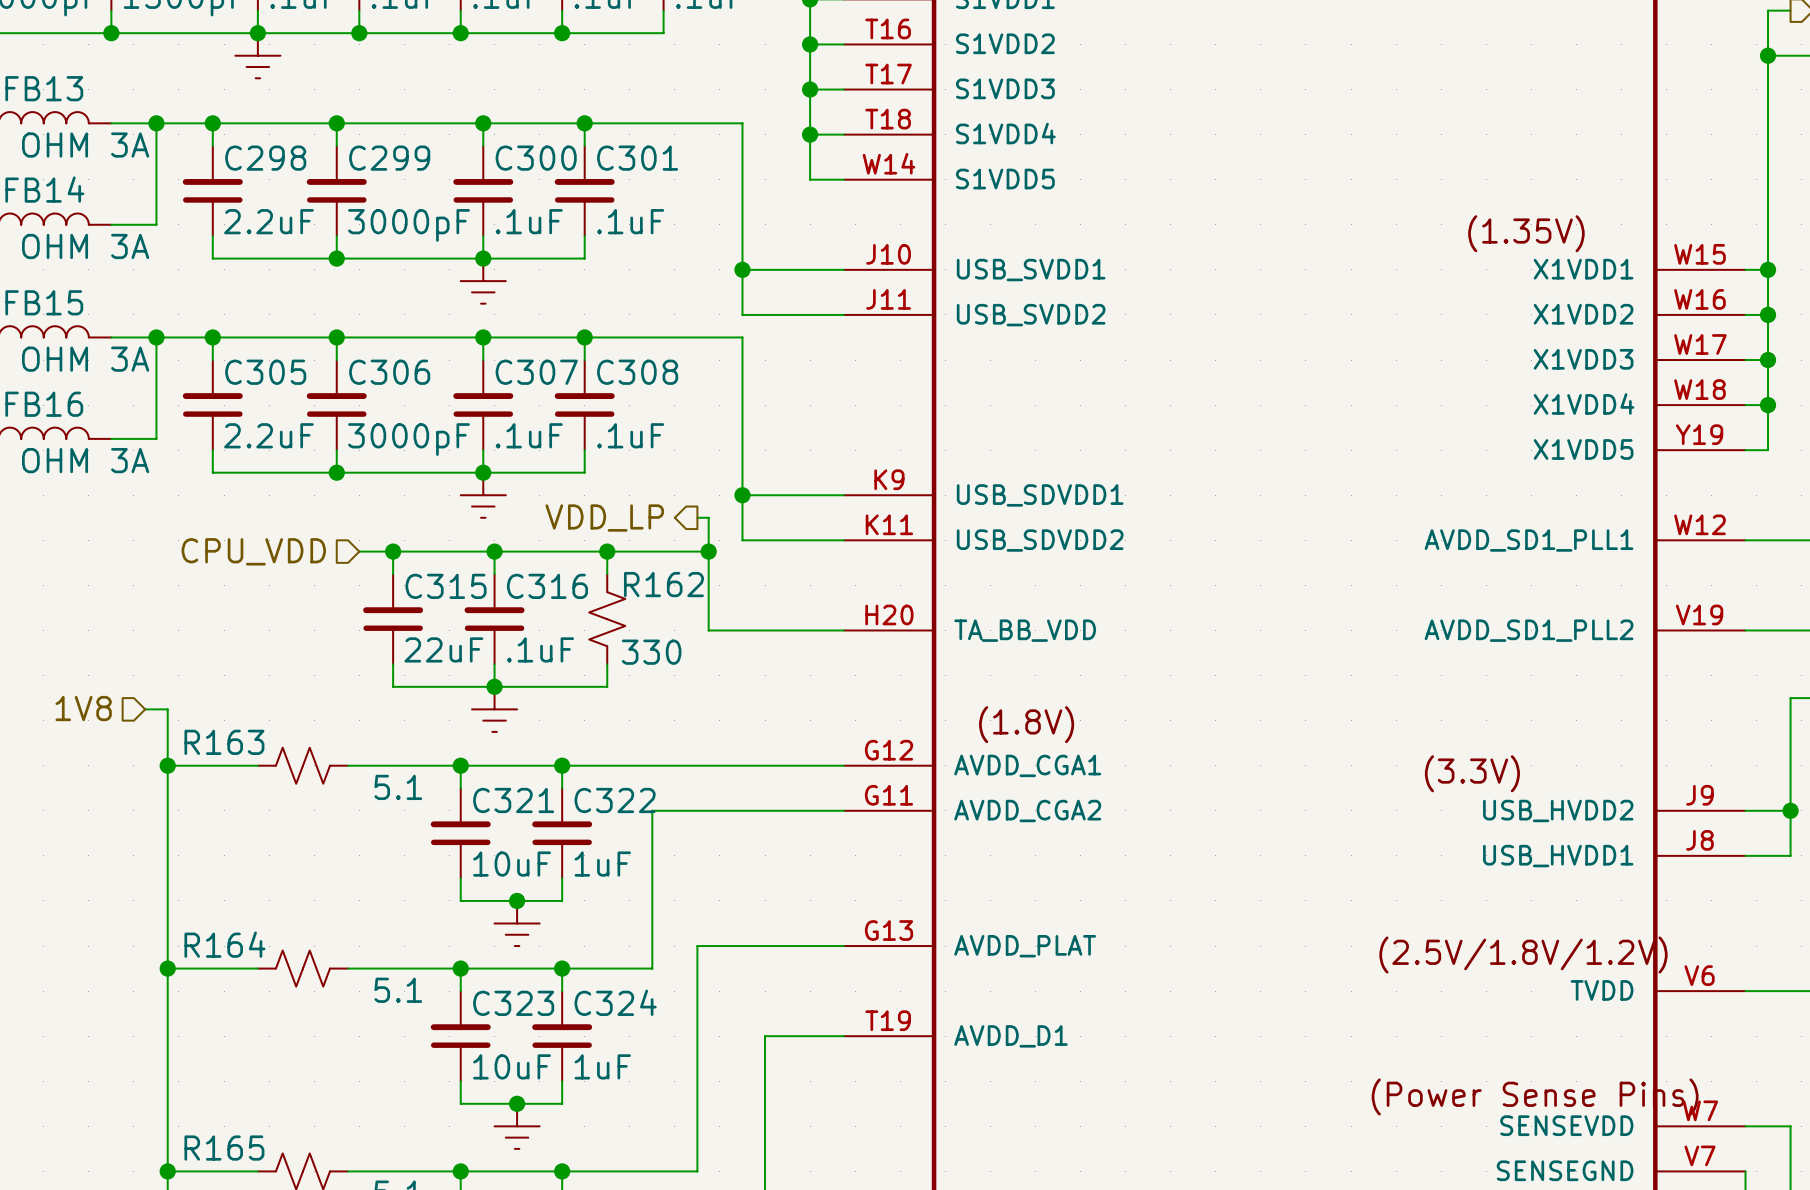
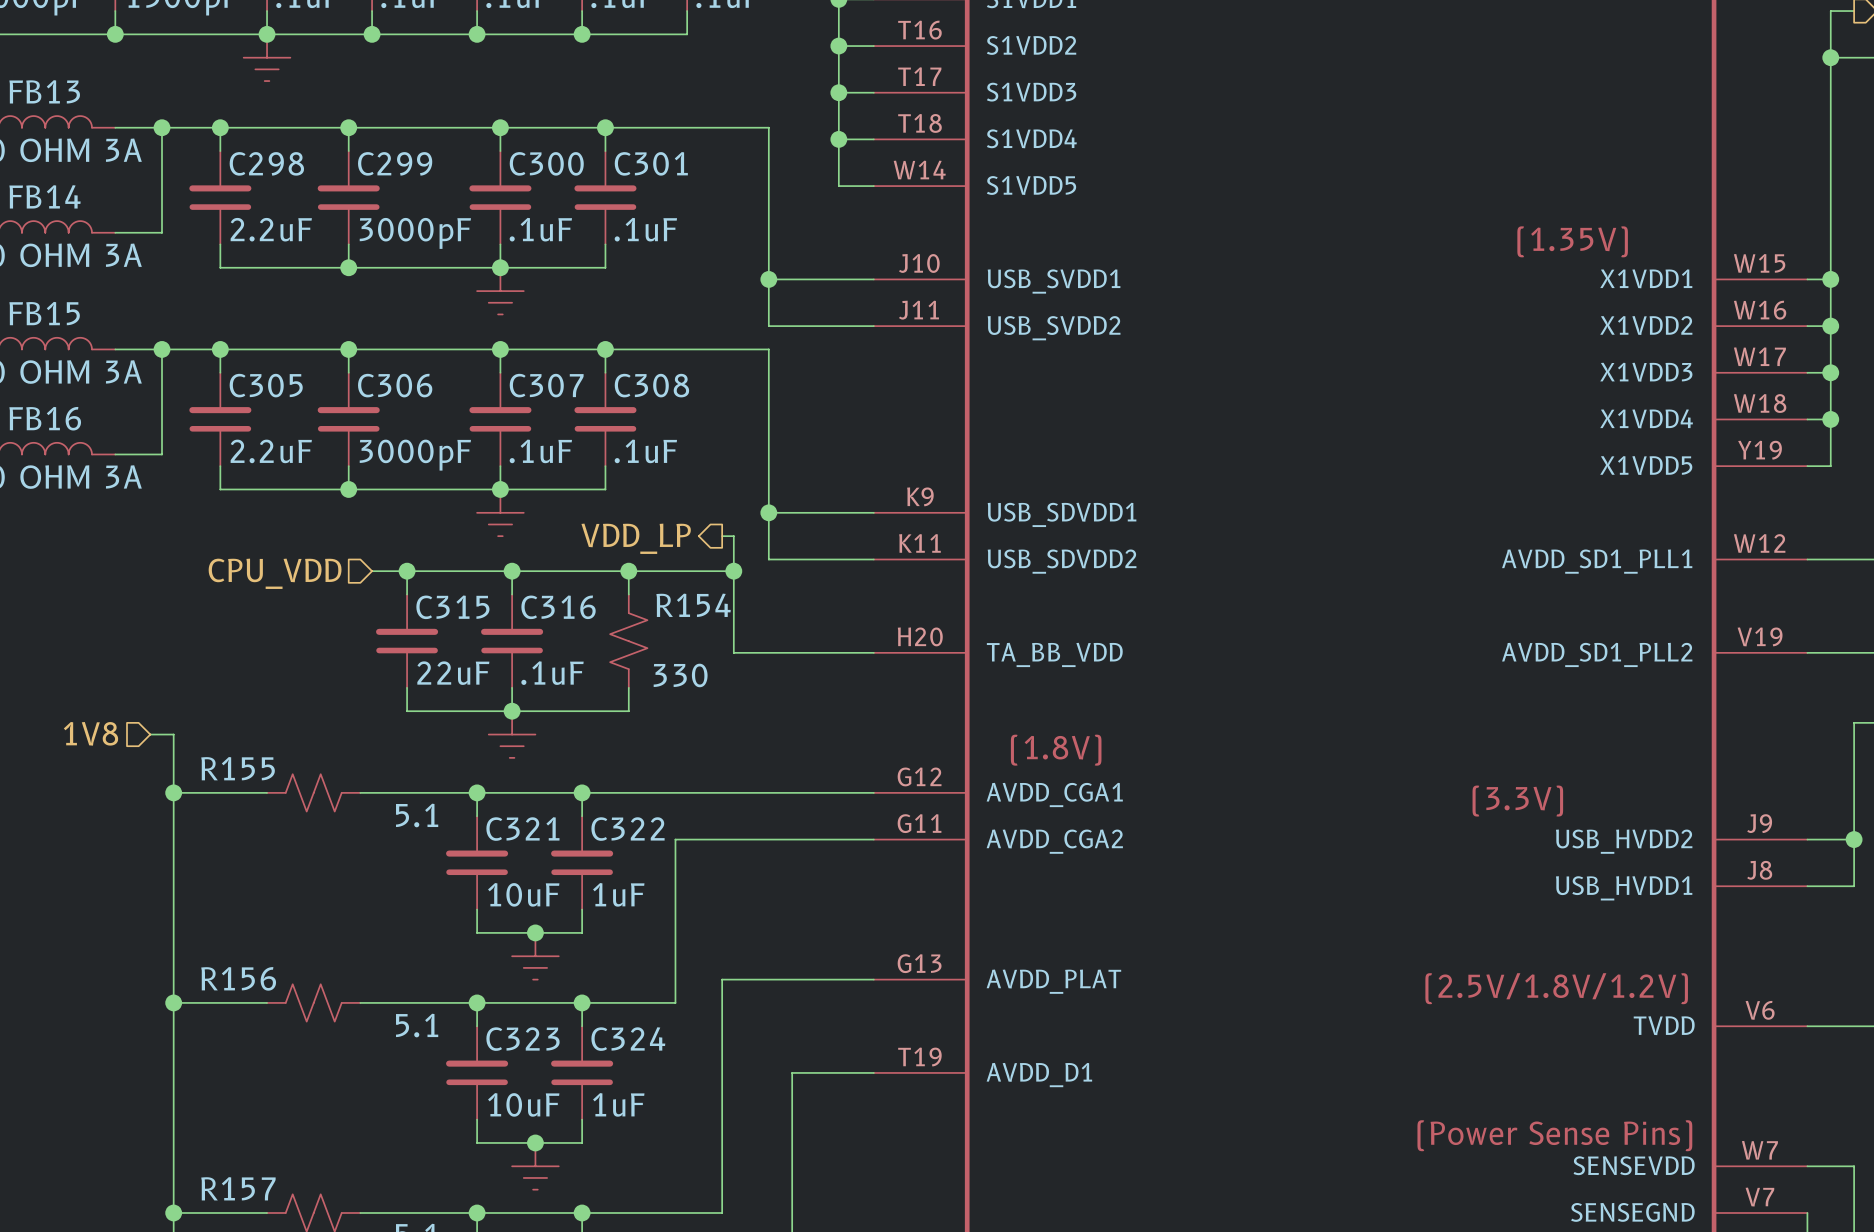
R162 name: R162 (663, 584) -> R154 (693, 605)
R163 name: R163 (224, 742) -> R155 (238, 768)
R164 name: R164 (224, 944) -> R156 (238, 978)
R165 name: R165 (224, 1148) -> R157 (238, 1188)

